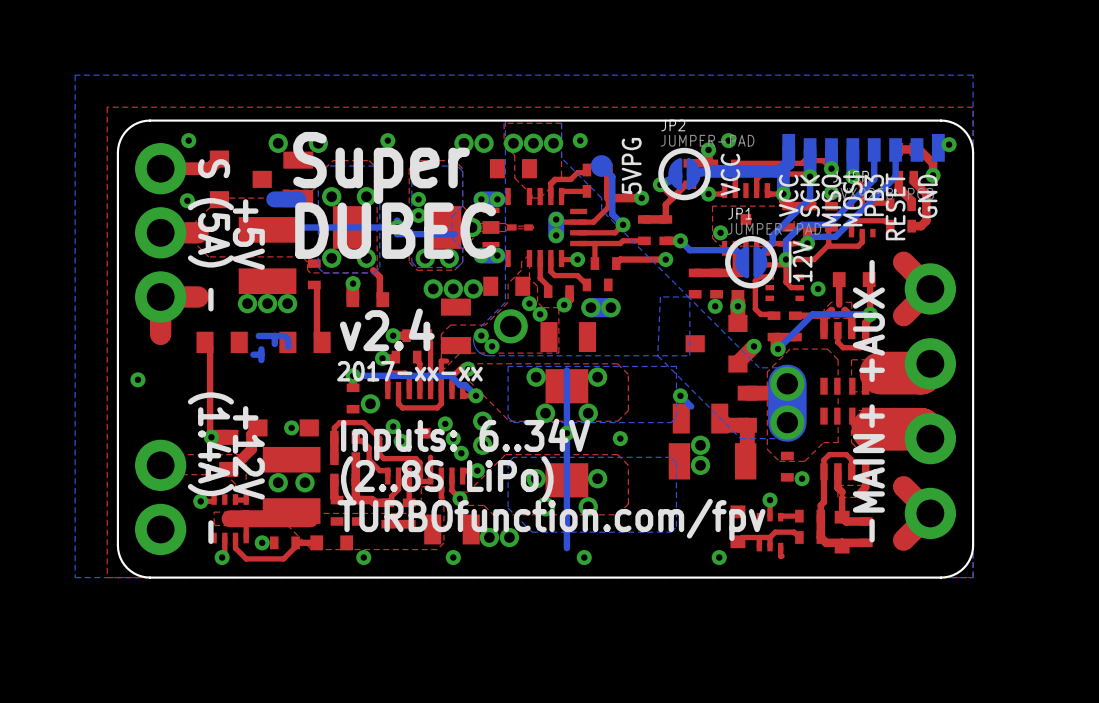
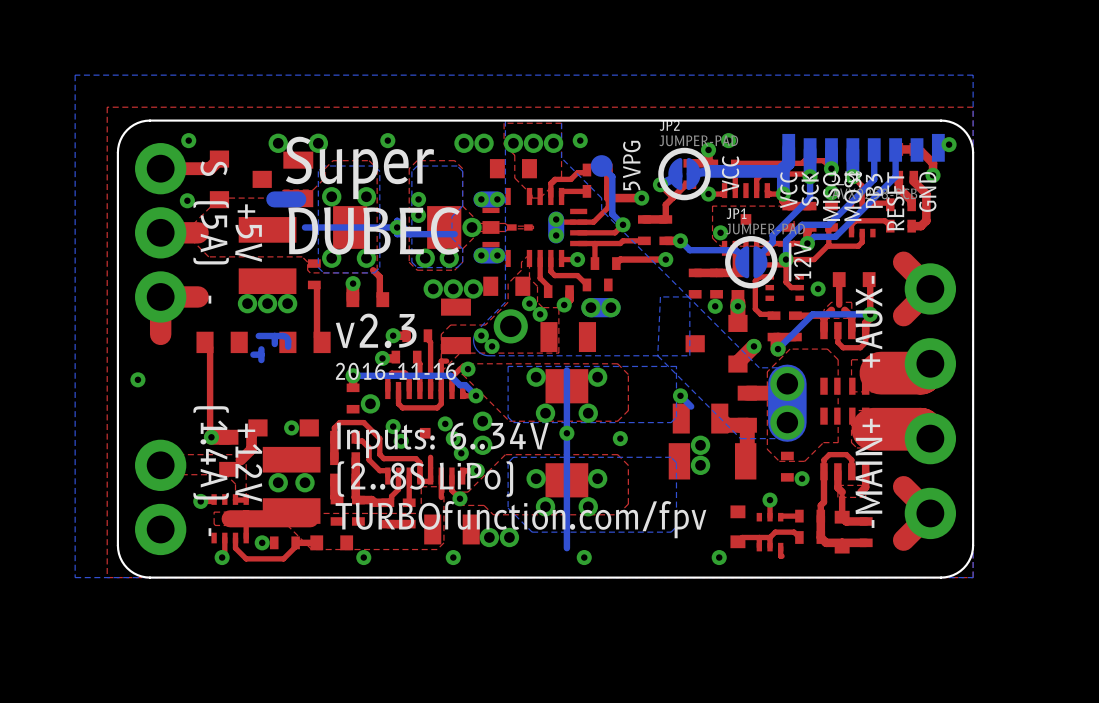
text: v2.4 (387, 329) -> v2.3 (376, 330)
text: 2017-xx-xx (409, 371) -> 2016-11-16 (396, 371)

